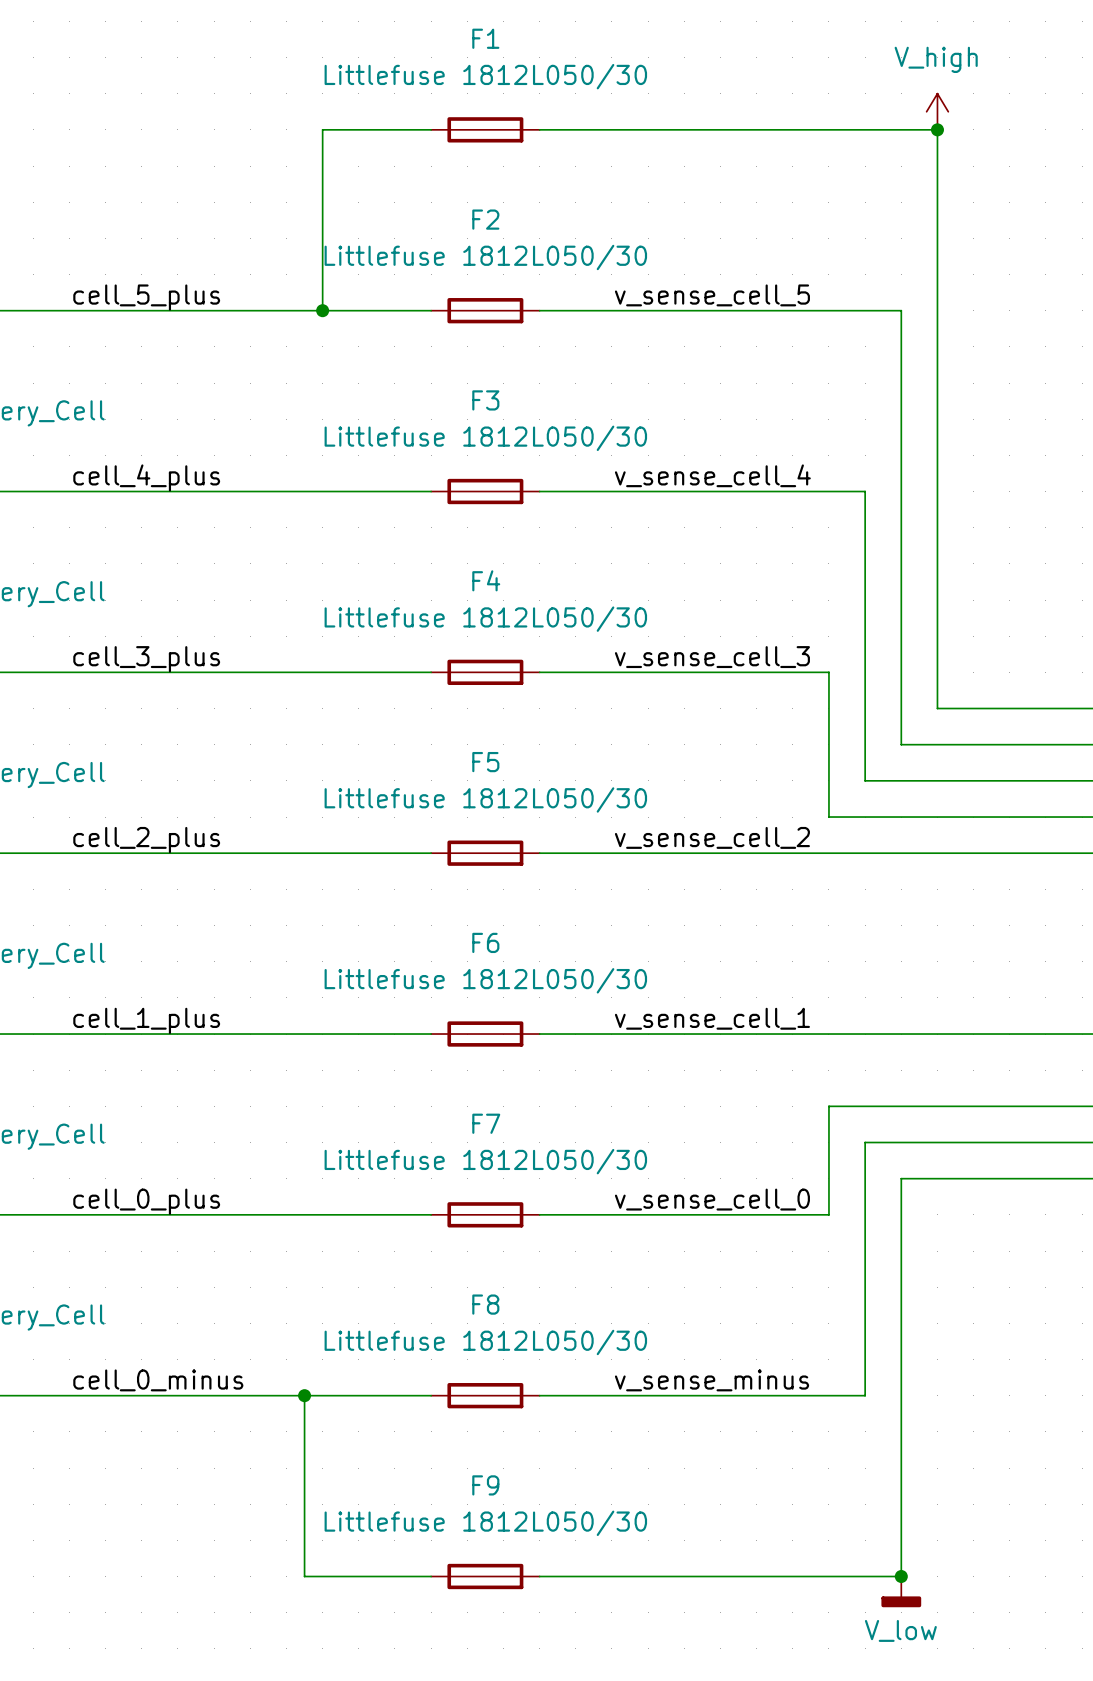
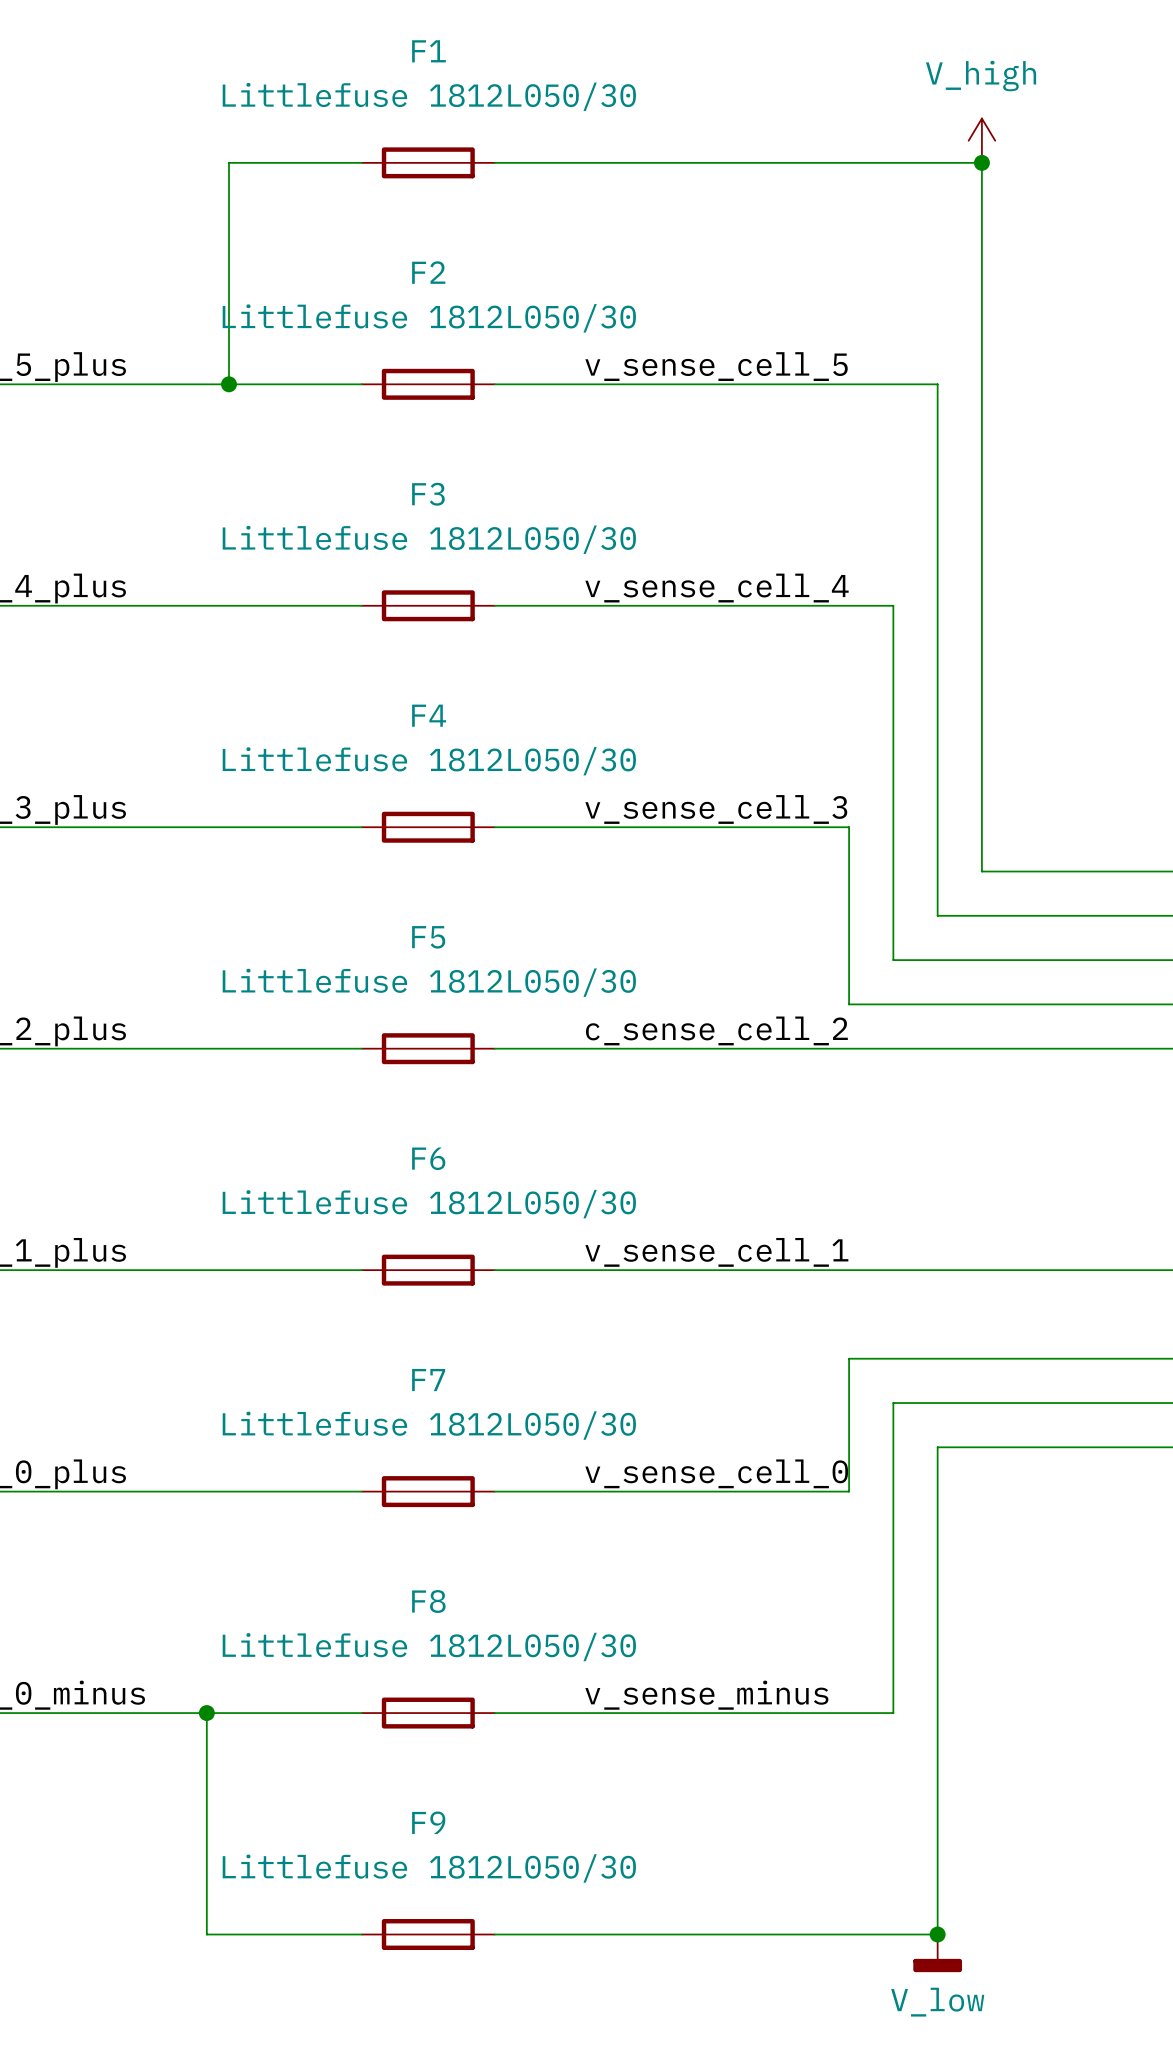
label: v_sense_cell_2 (712, 837) -> c_sense_cell_2 (716, 1030)

